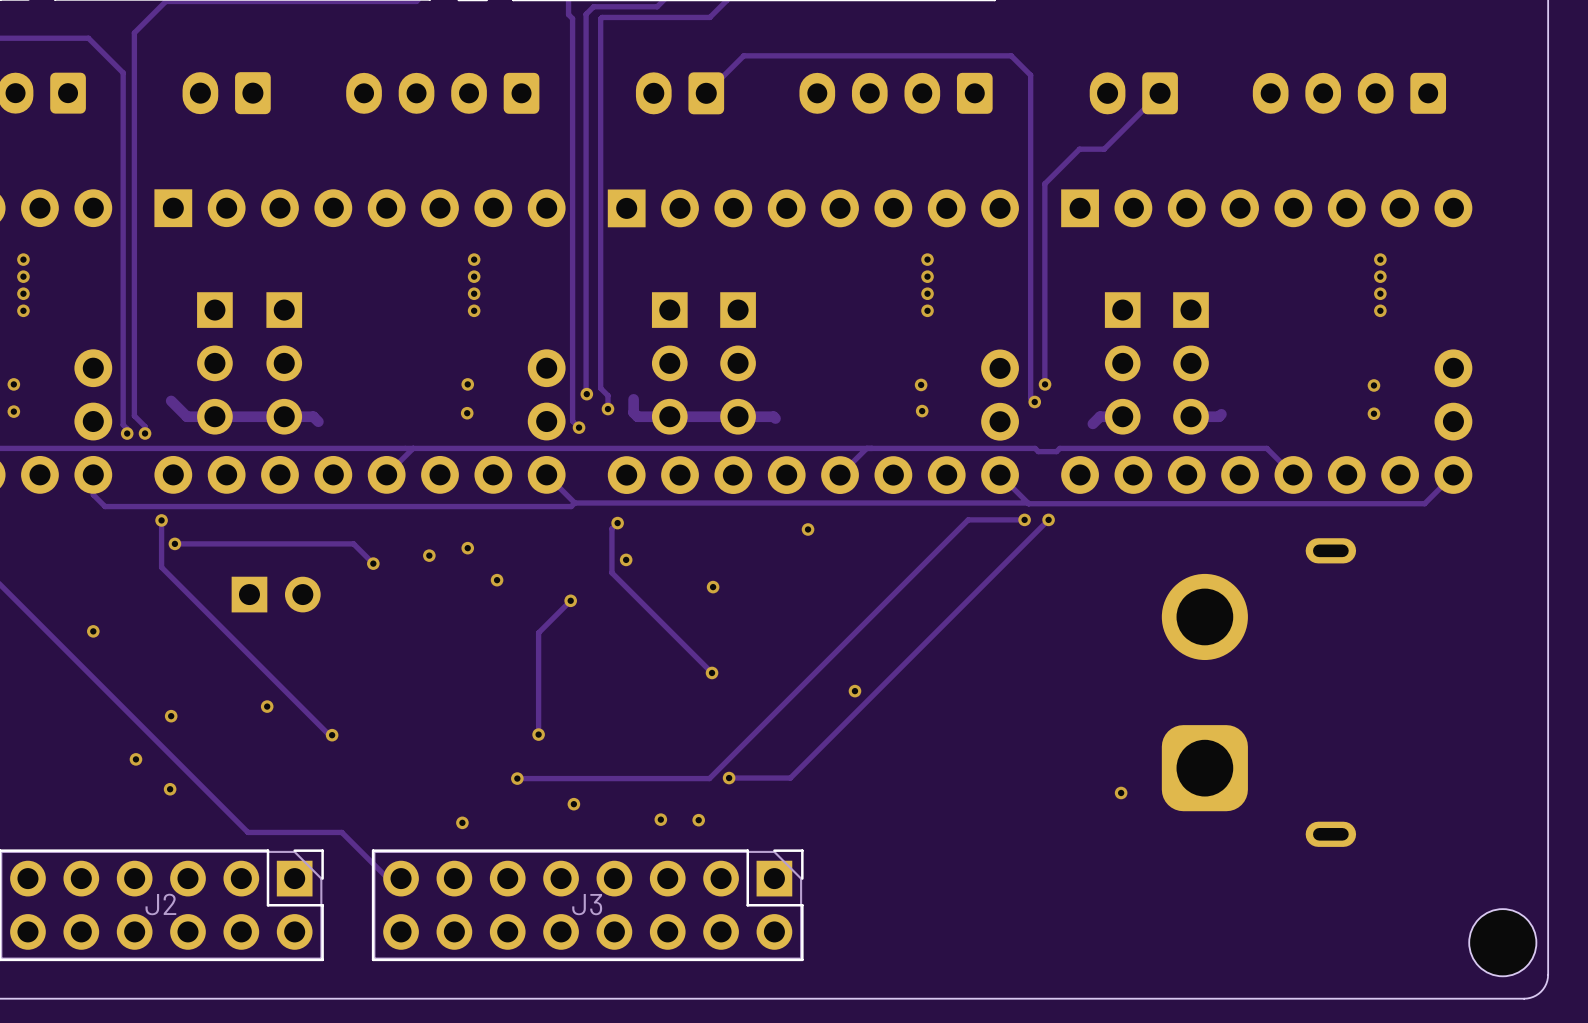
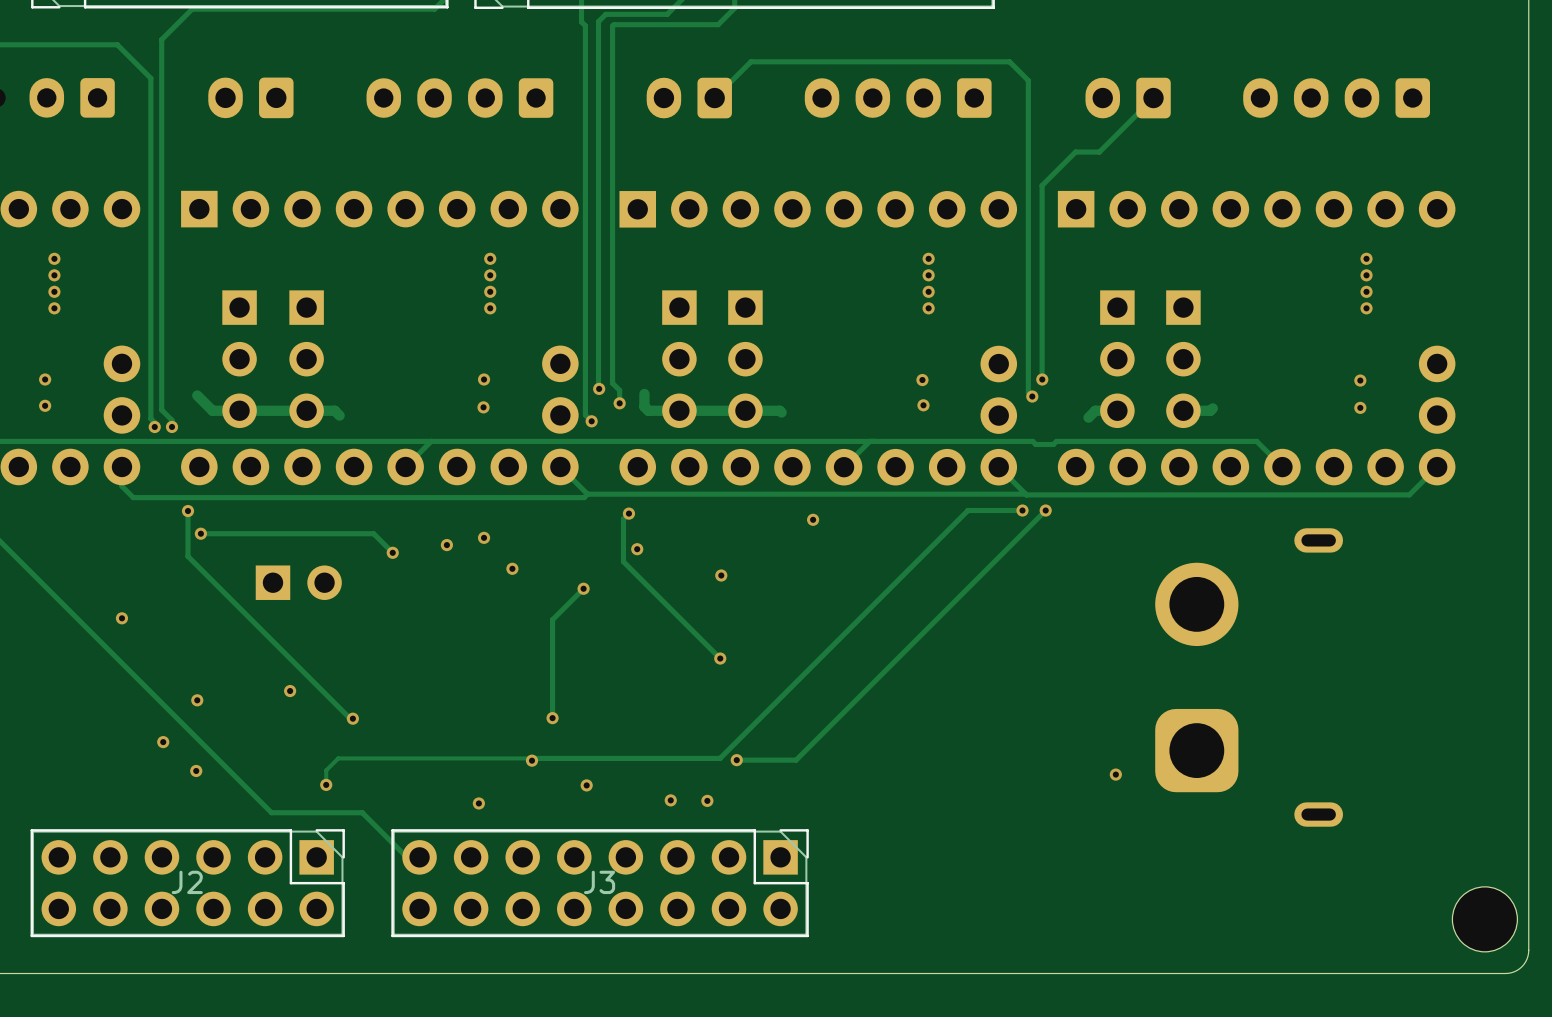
via: (854, 691) -> none
track: (711, 776) (709, 778) (517, 778) -> (720, 758) (338, 758) (326, 770) (326, 784)
via: none -> (326, 784)

